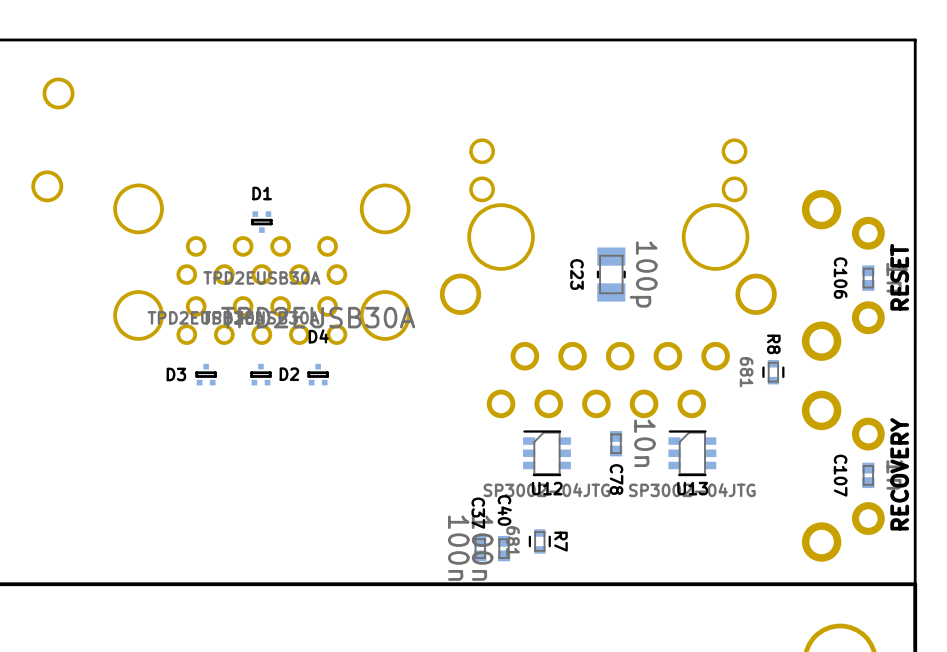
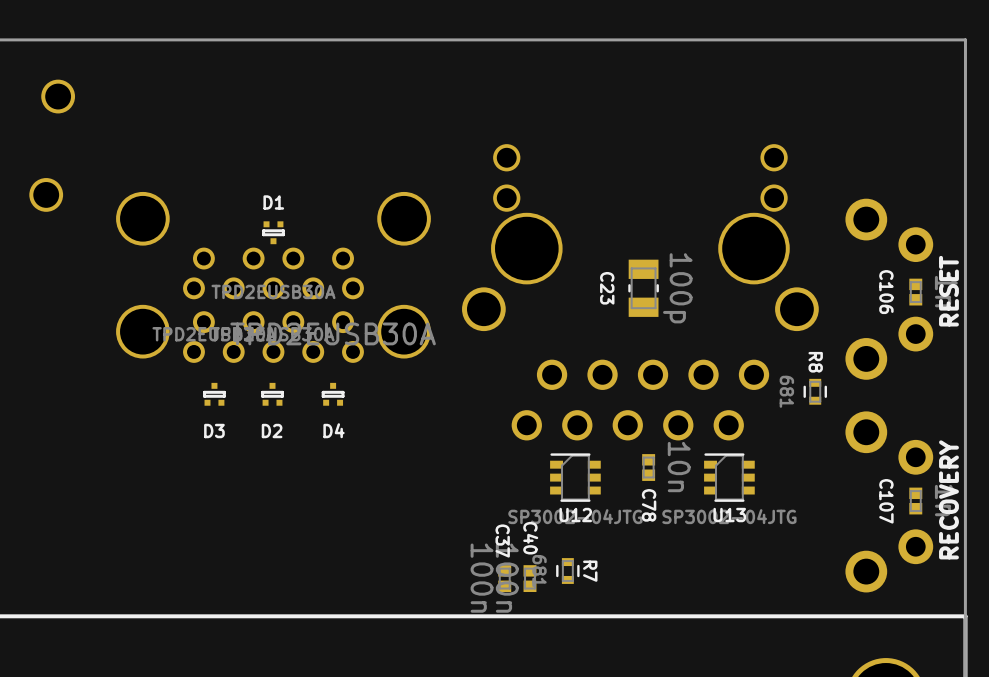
D4 name position: D4 (318, 336) -> D4 (333, 430)
D3 name position: D3 (176, 374) -> D3 (214, 431)
D2 name position: D2 (289, 374) -> D2 (272, 431)

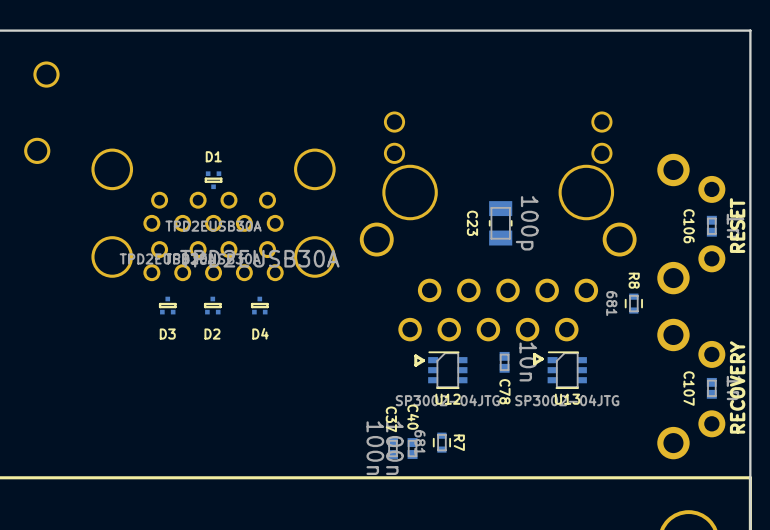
line: none -> (534, 354) (534, 363) (542, 359) (534, 354)
line: none -> (415, 355) (423, 360) (415, 365) (415, 355)

